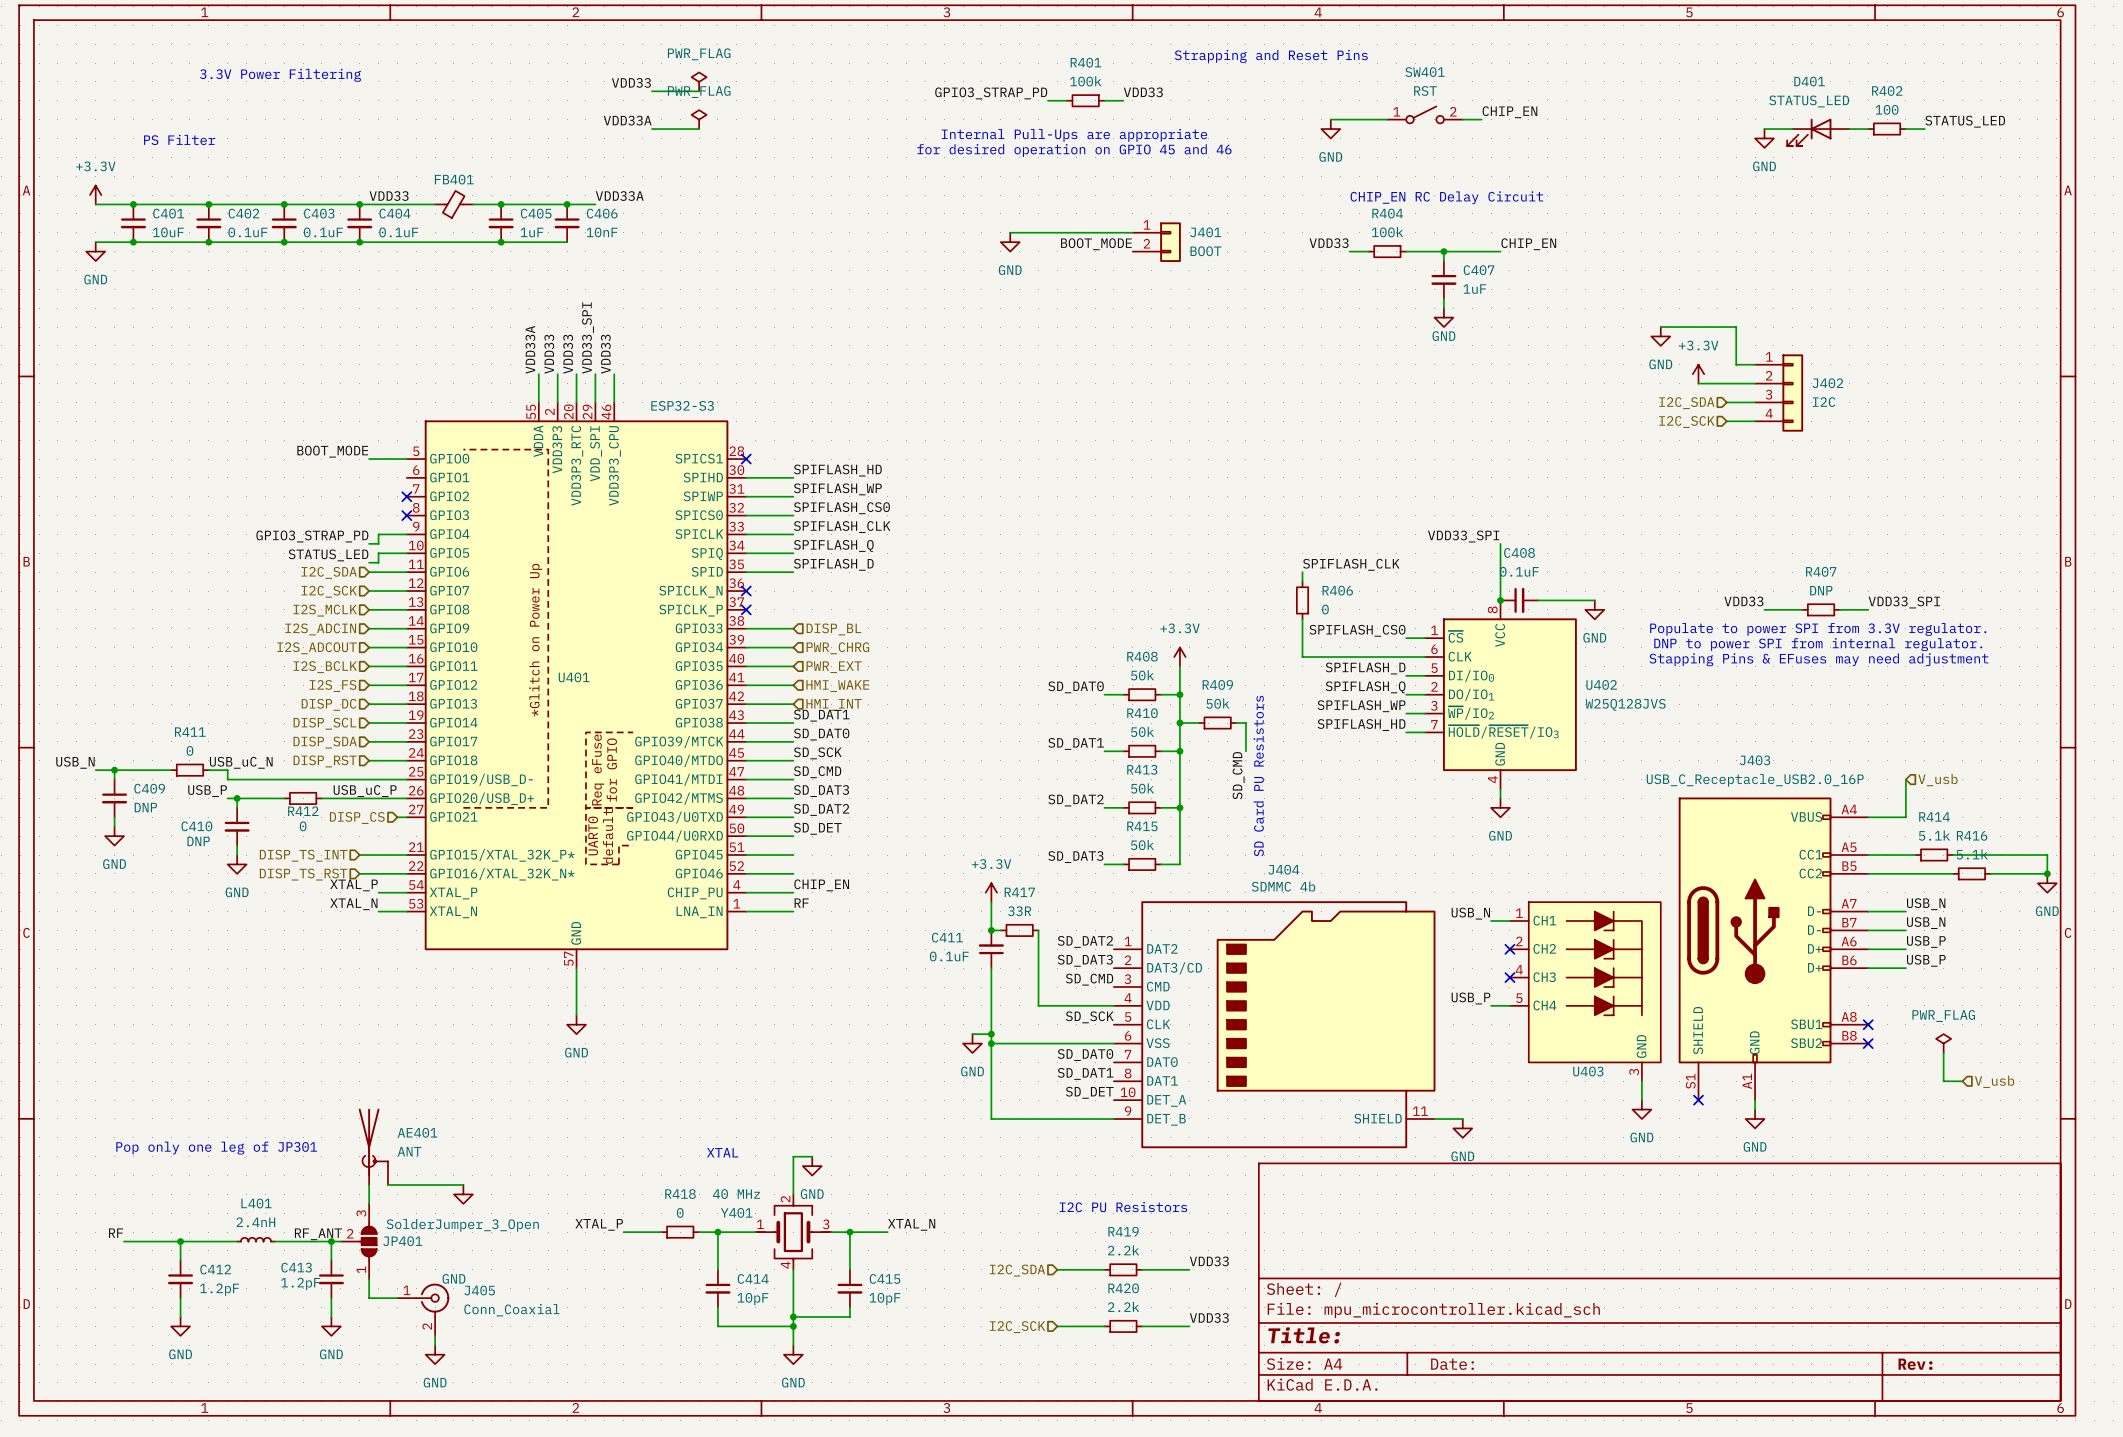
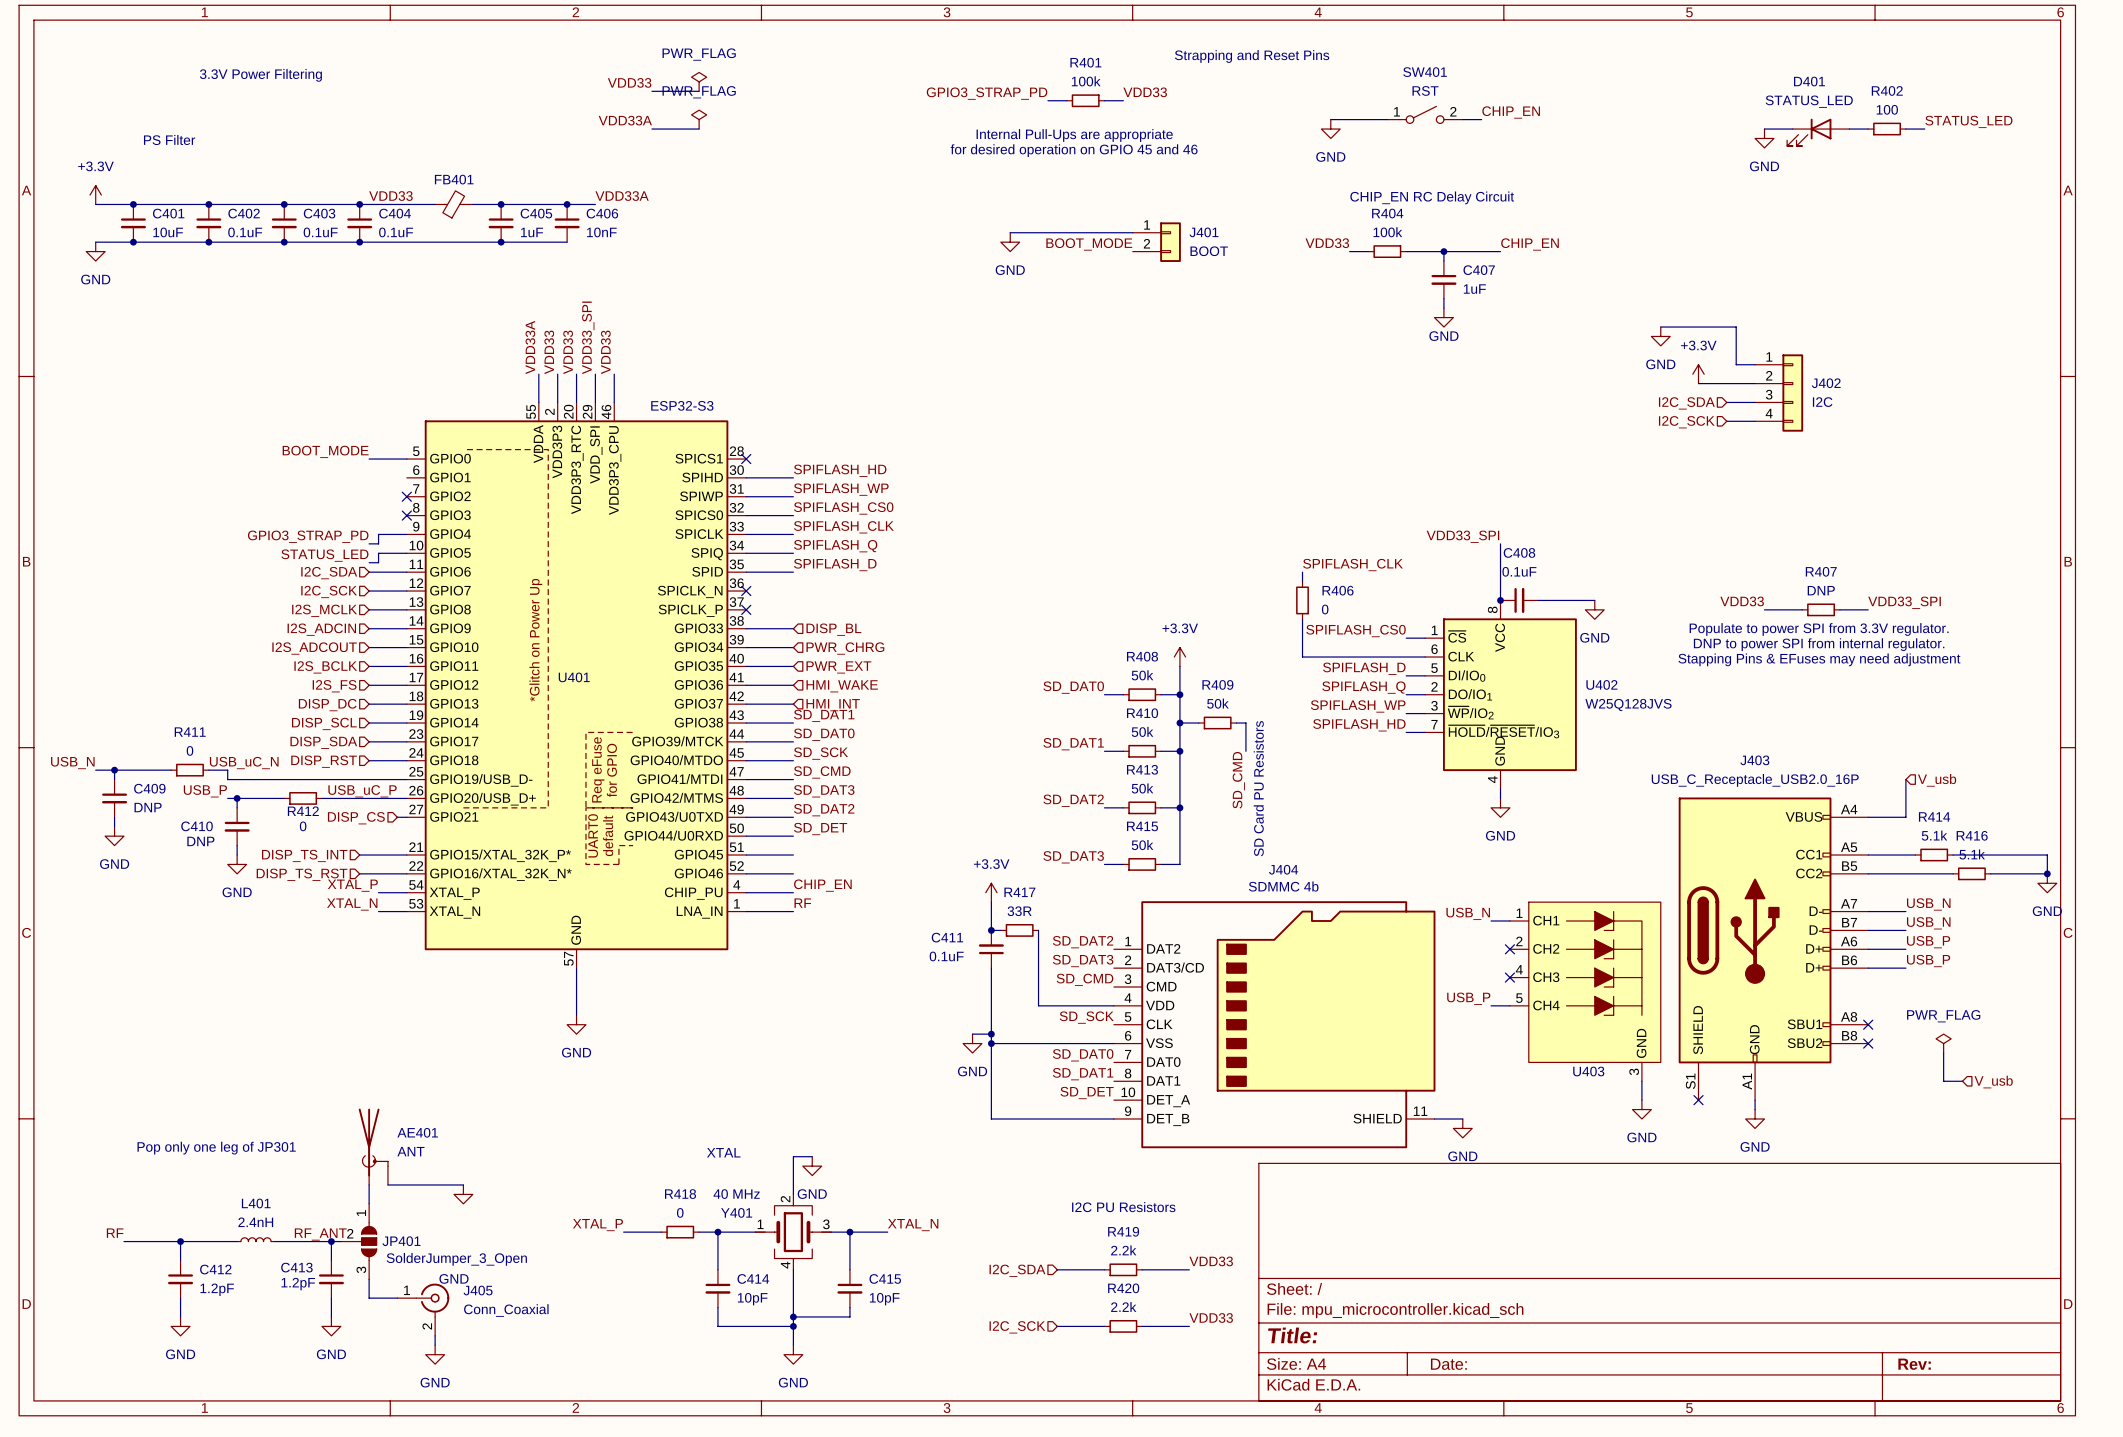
JP401 flip: as is (368, 1241) -> up-down (368, 1241)

